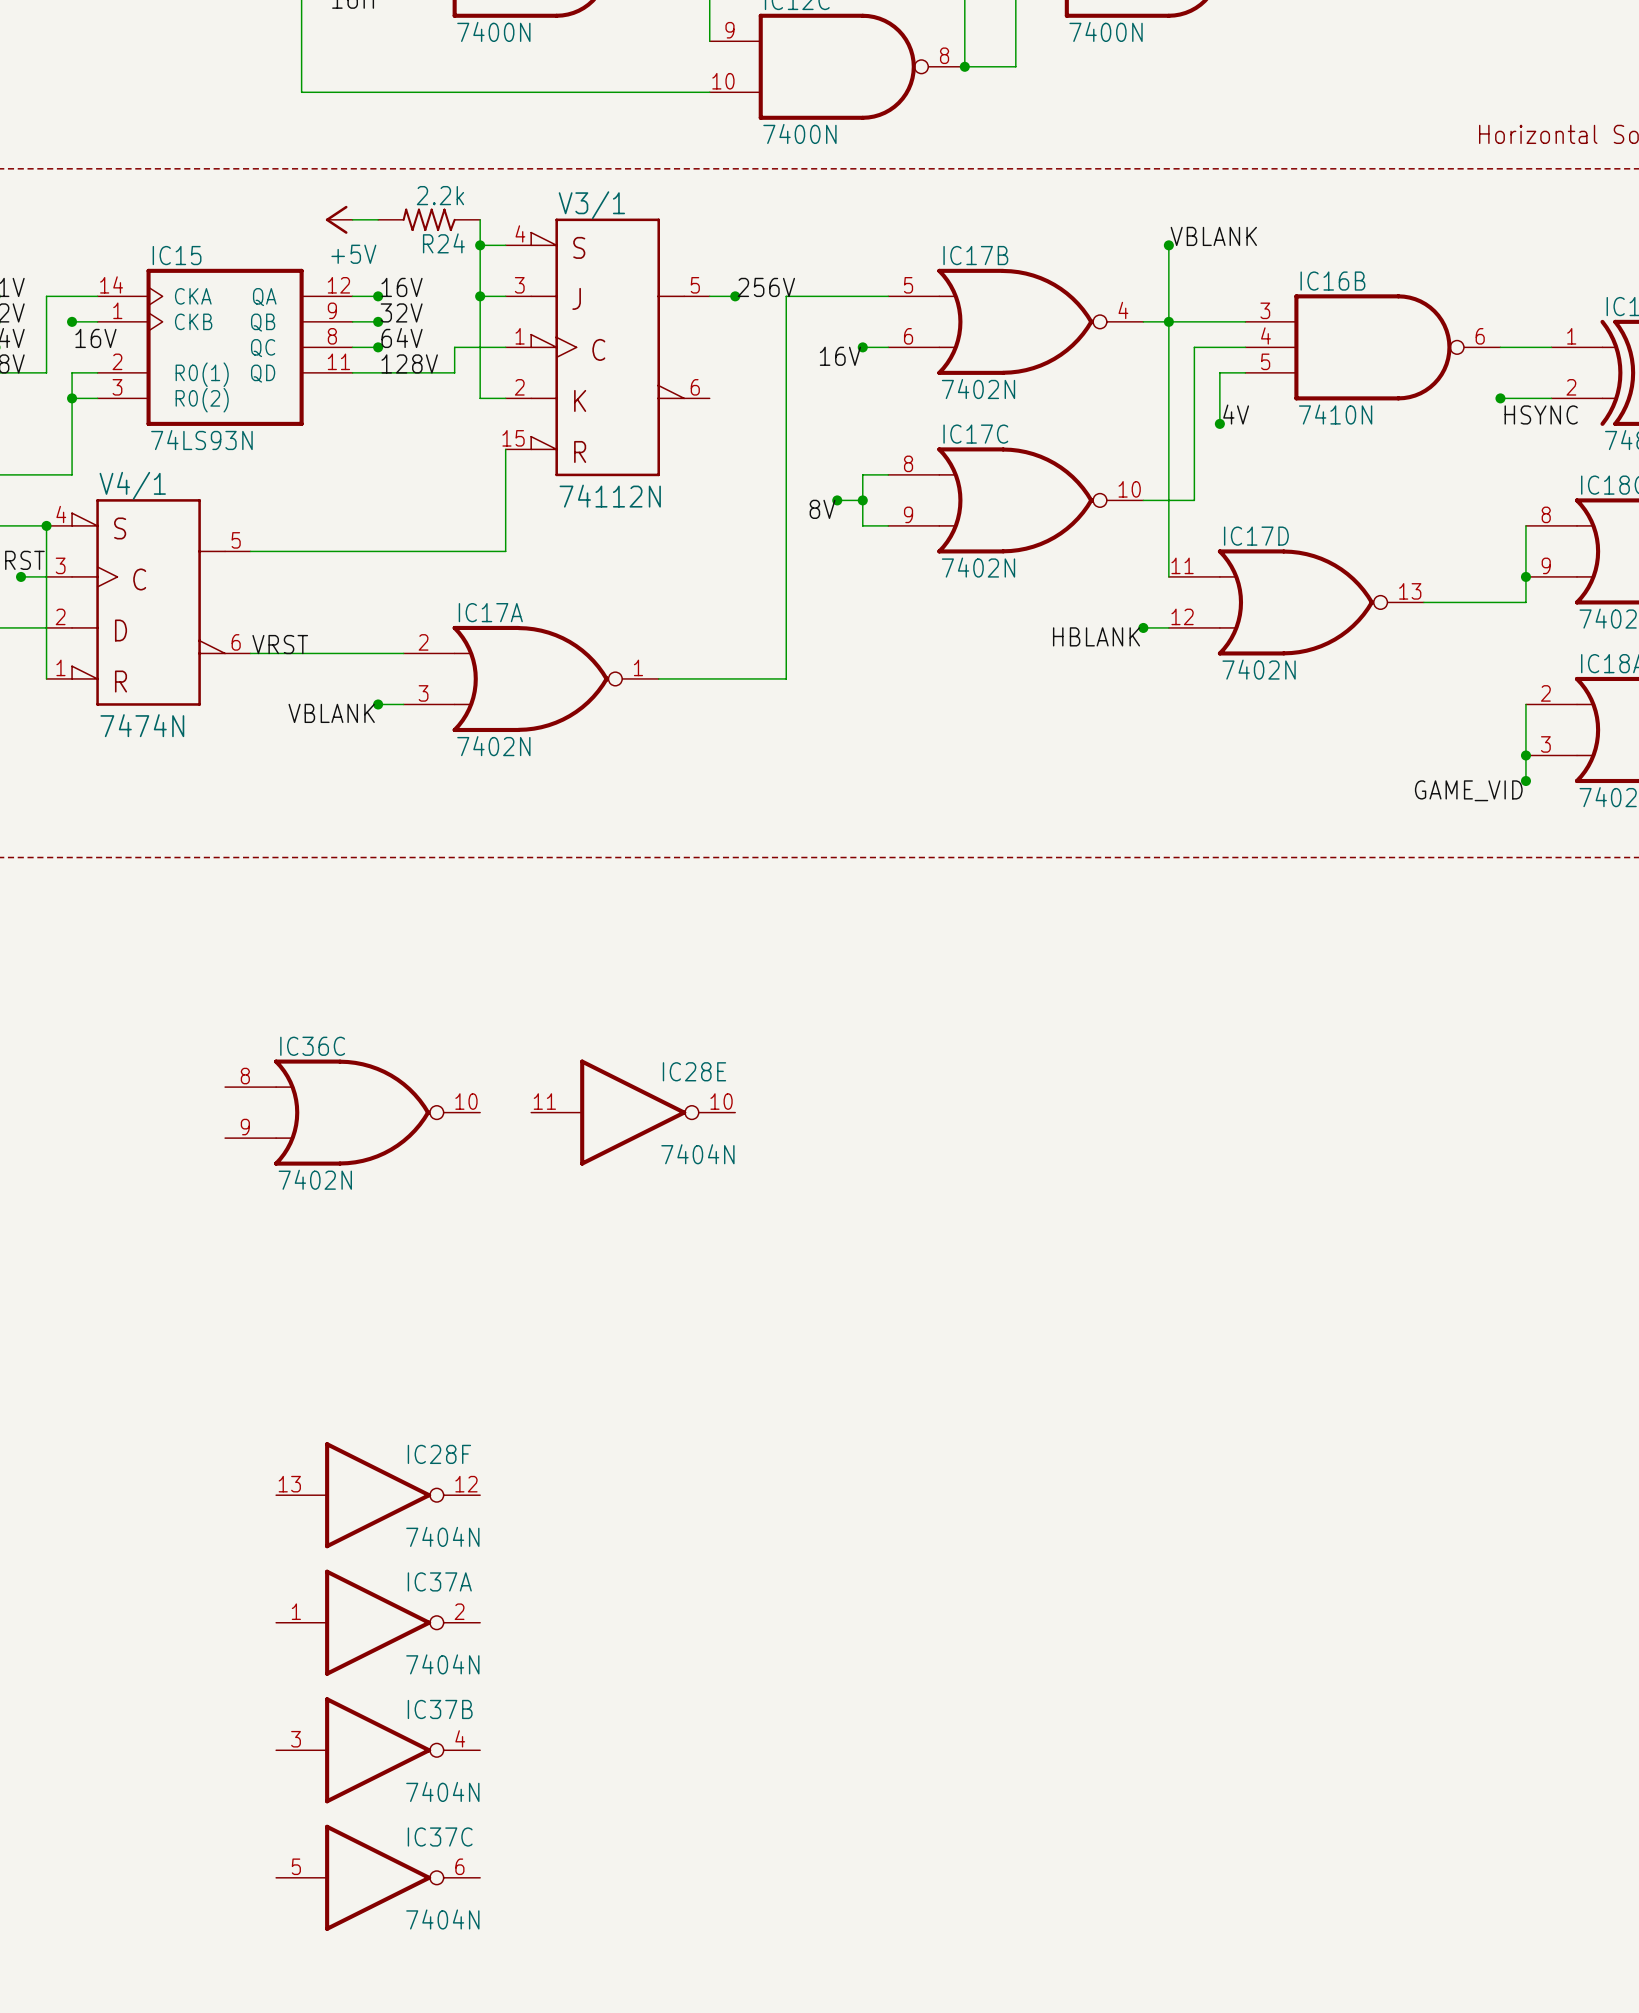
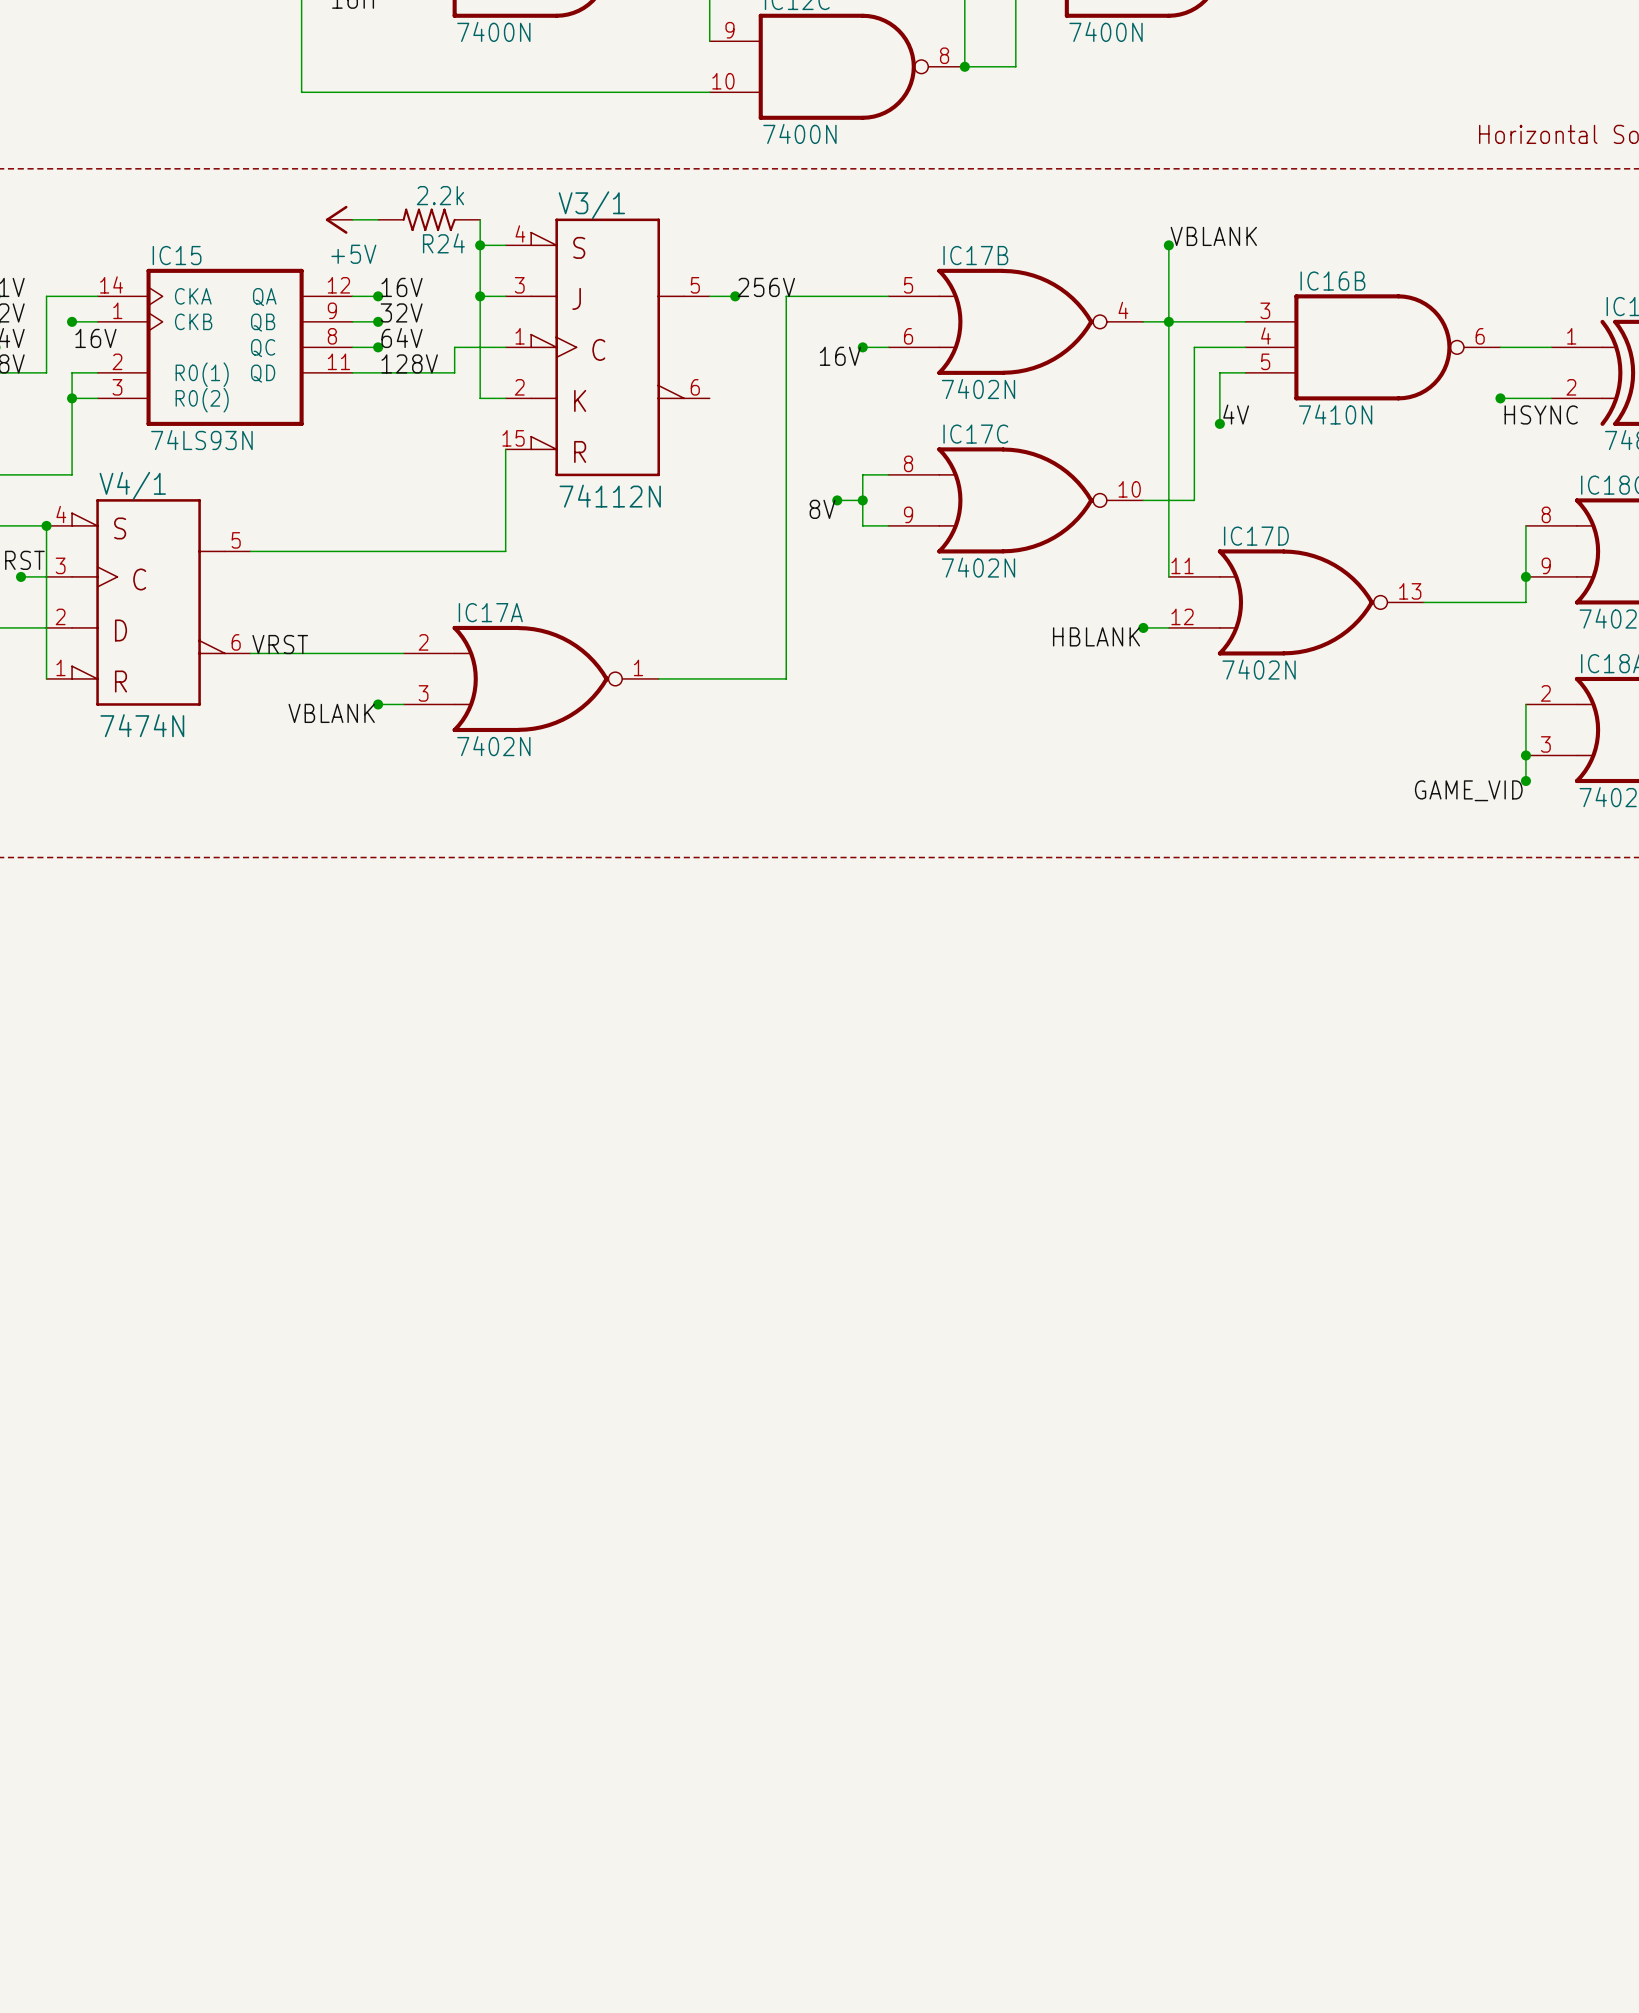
IC36C: 7402N (352, 1112) -> none
IC28E: 7404N (633, 1112) -> none
IC28F: 7404N (378, 1495) -> none
IC37A: 7404N (378, 1622) -> none
IC37B: 7404N (378, 1750) -> none
IC37C: 7404N (378, 1877) -> none

